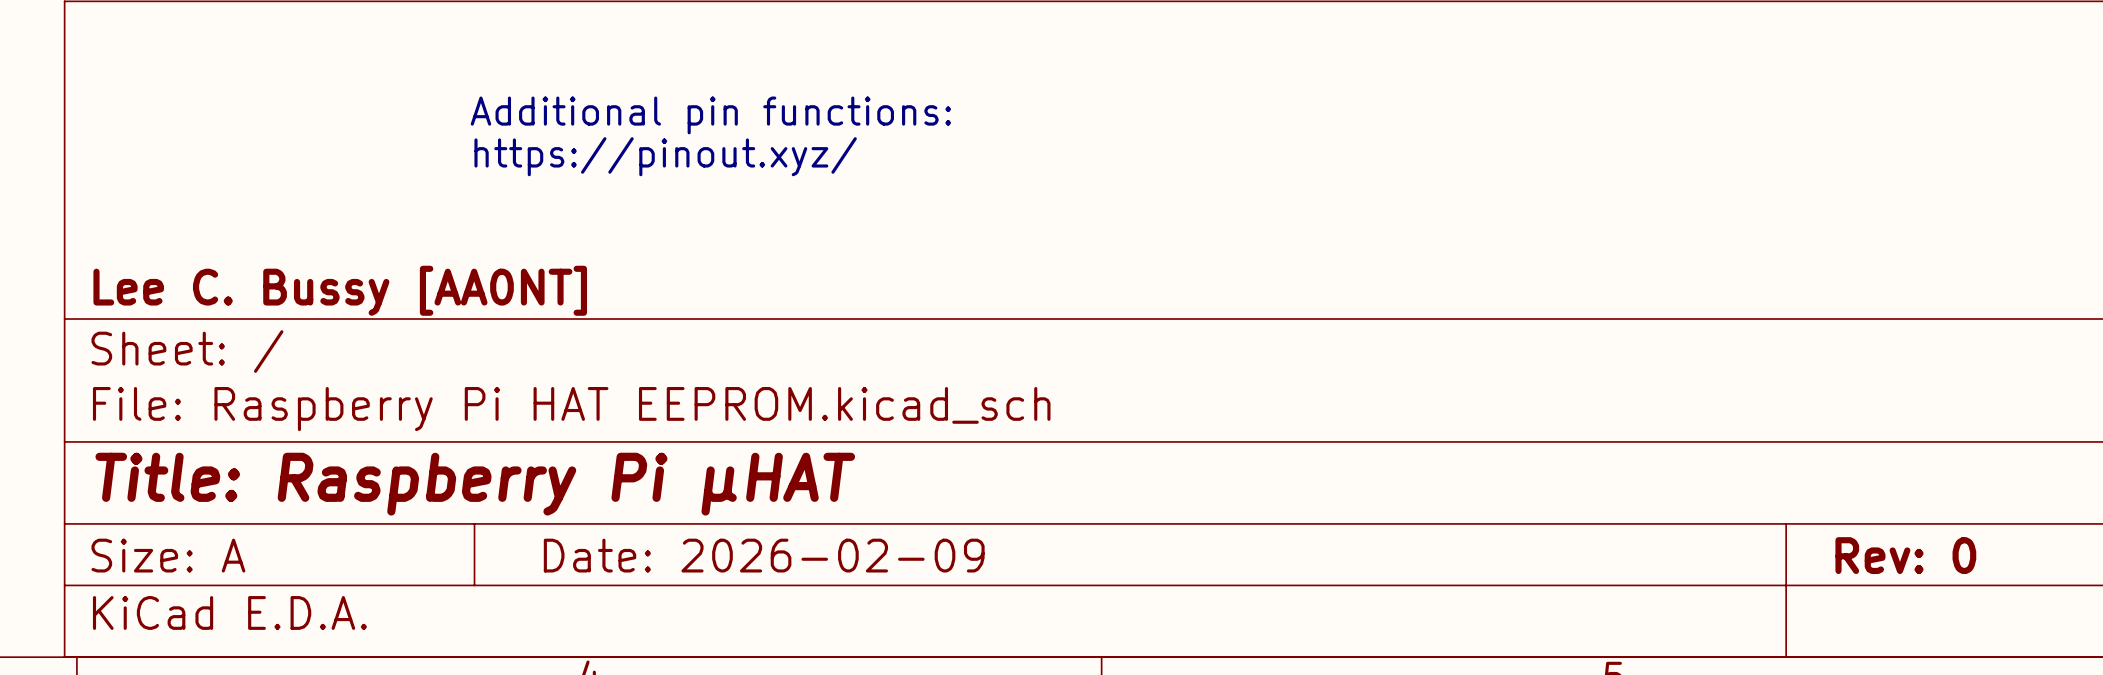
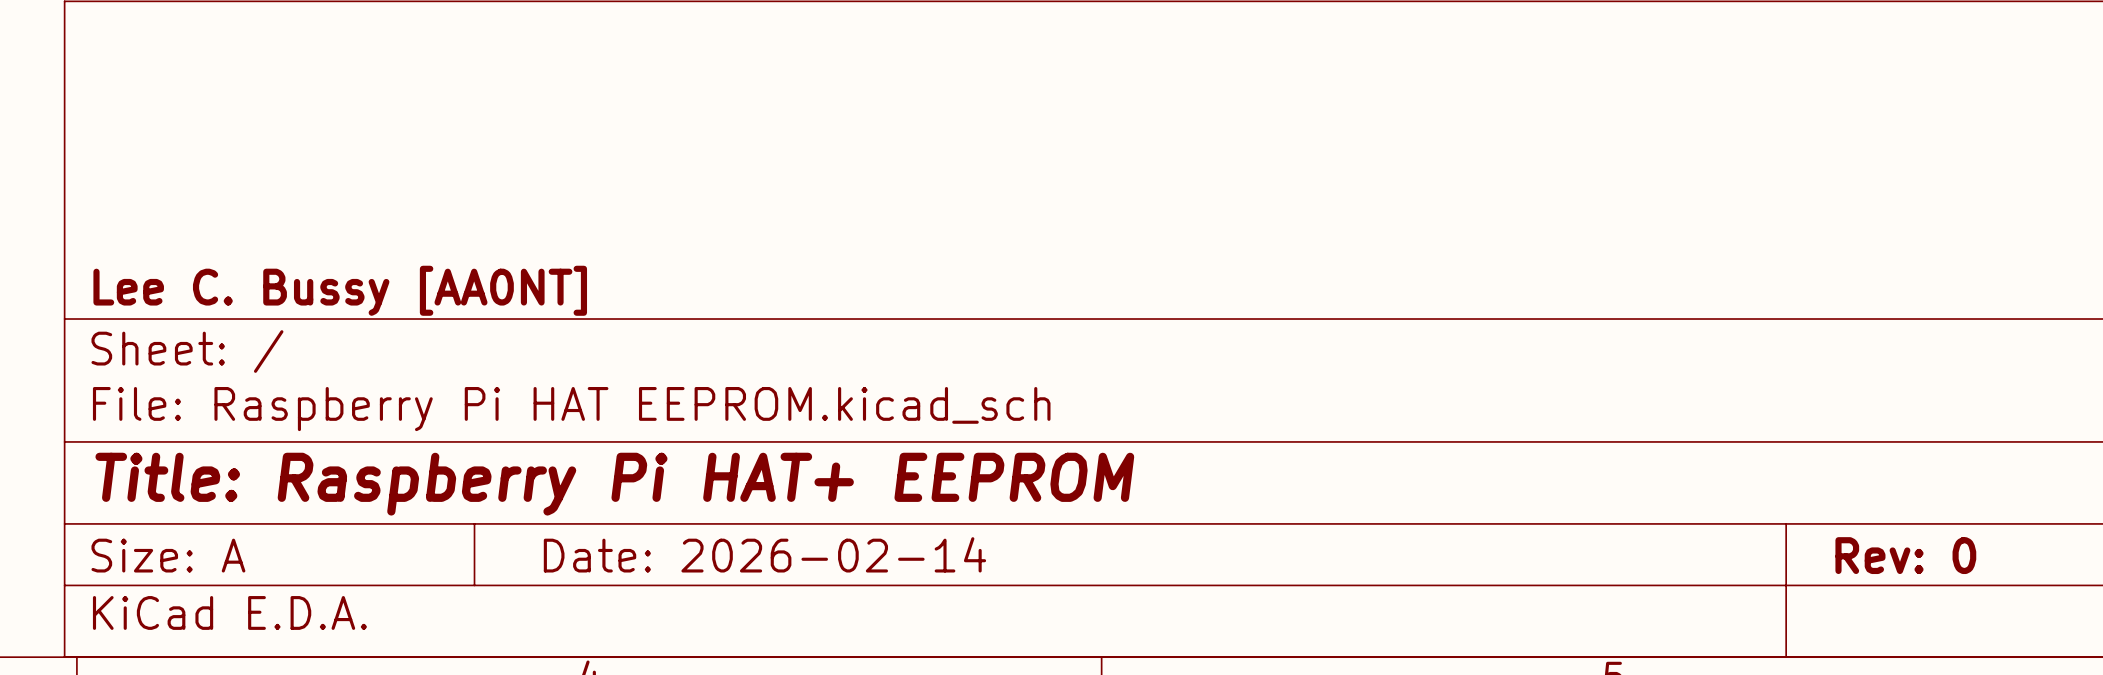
text: Additional pin functions: (710, 115) -> none
text: https://pinout.xyz/ (665, 156) -> none
title block: Title: Raspberry Pi µHAT (475, 484) -> Title: Raspberry Pi HAT+ EEPROM (614, 484)
title block: Date: 2026-02-09 (764, 555) -> Date: 2026-02-14 (764, 554)

